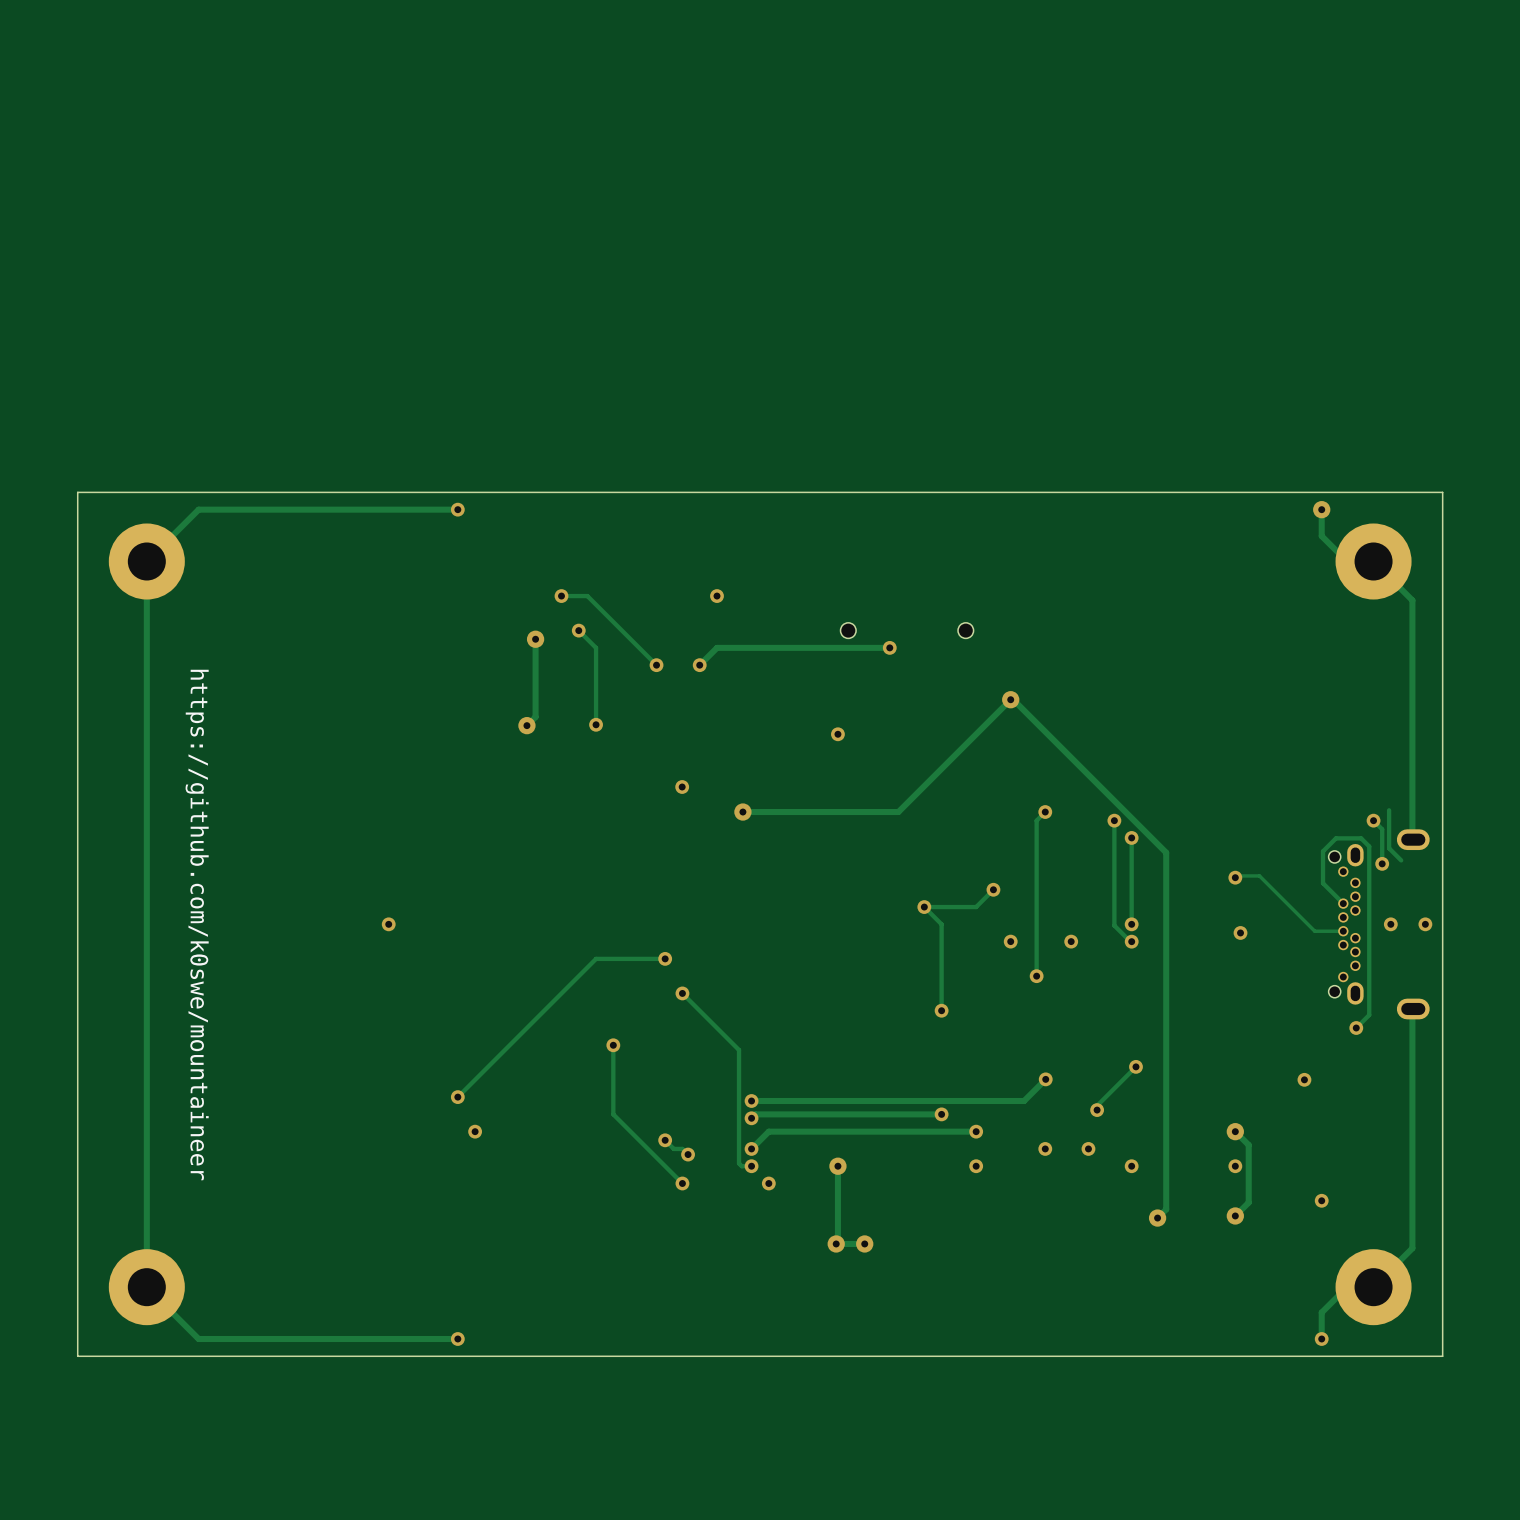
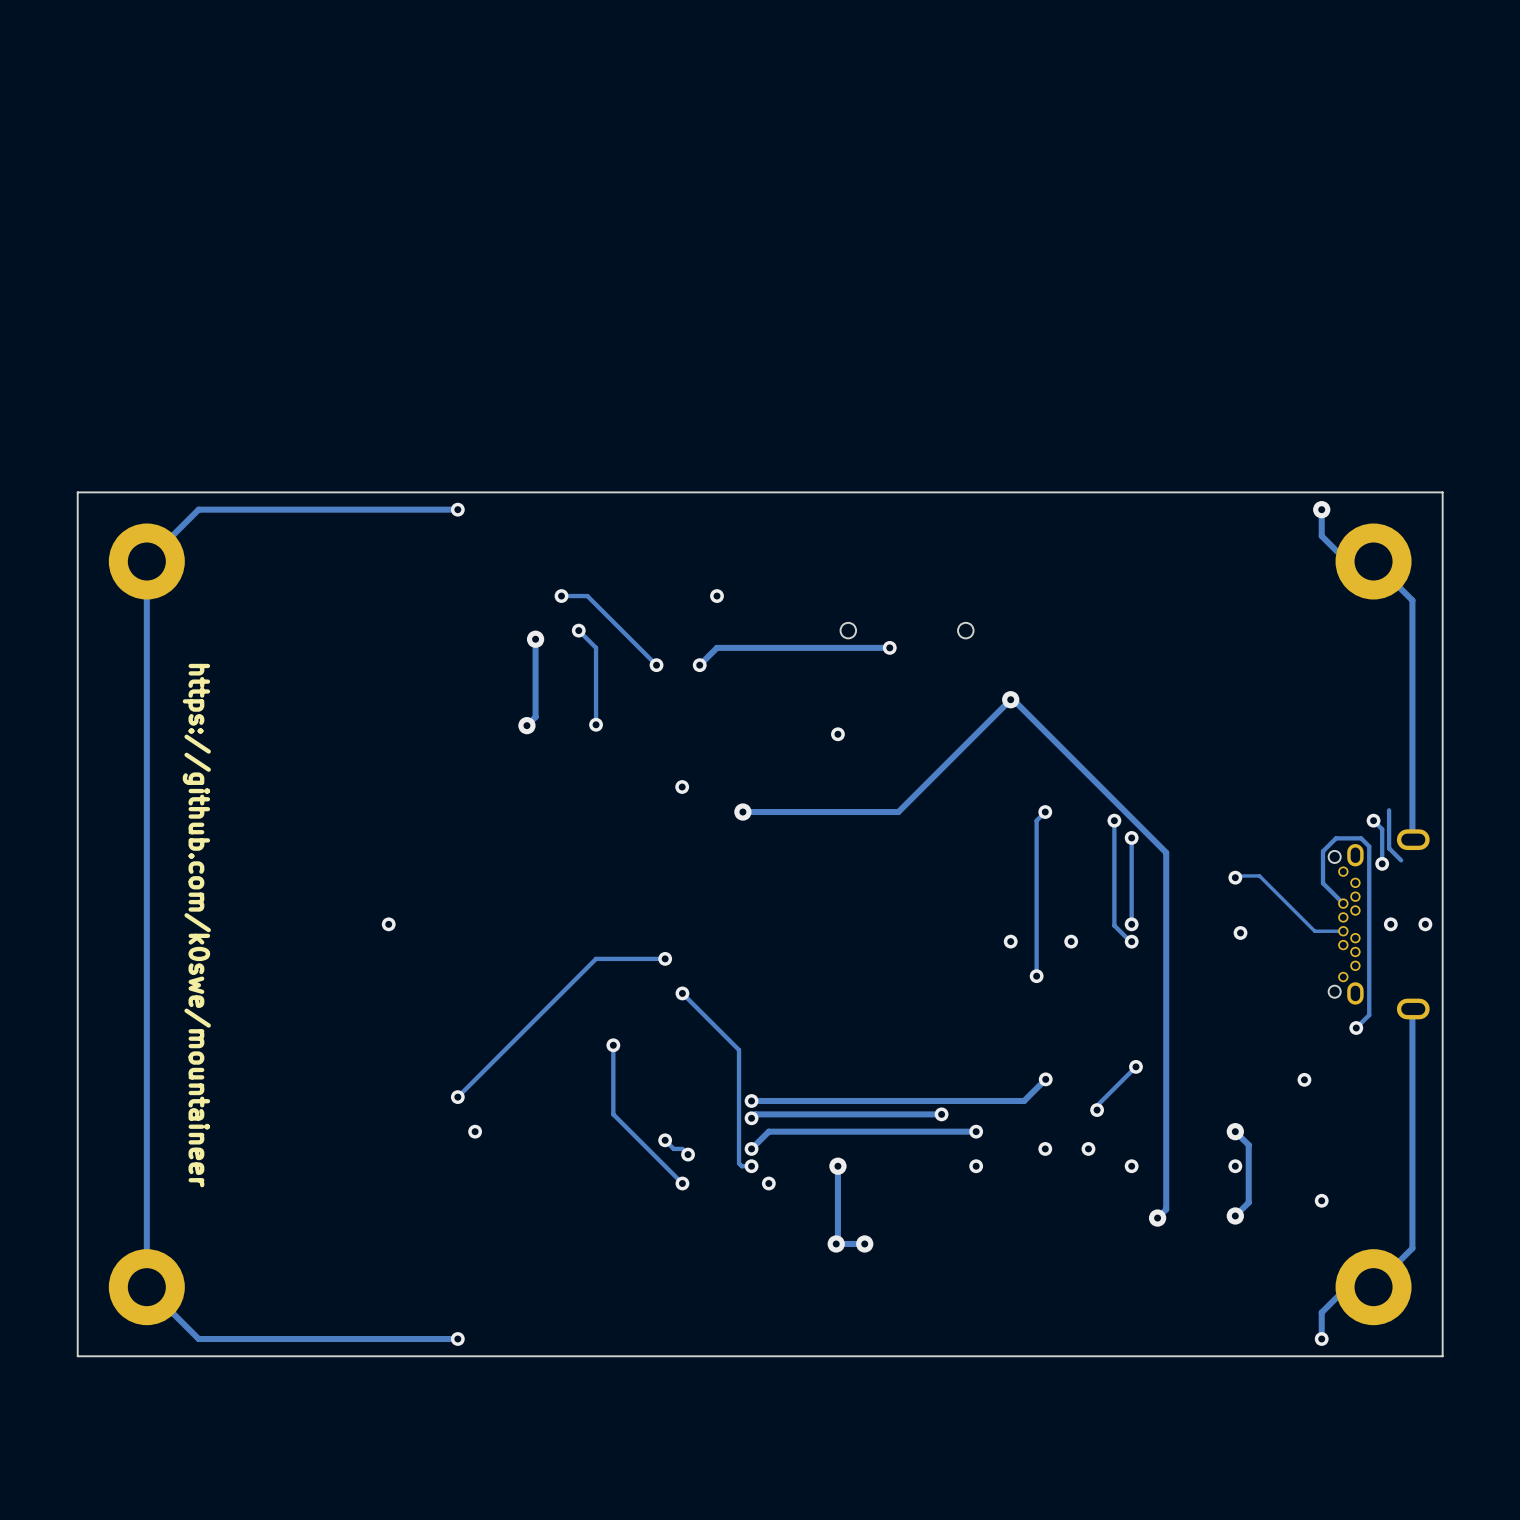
track: (993, 889) (976, 907) (924, 907) (941, 924) (941, 1010) -> none
via: (993, 889) -> none
via: (924, 907) -> none
via: (941, 1010) -> none

